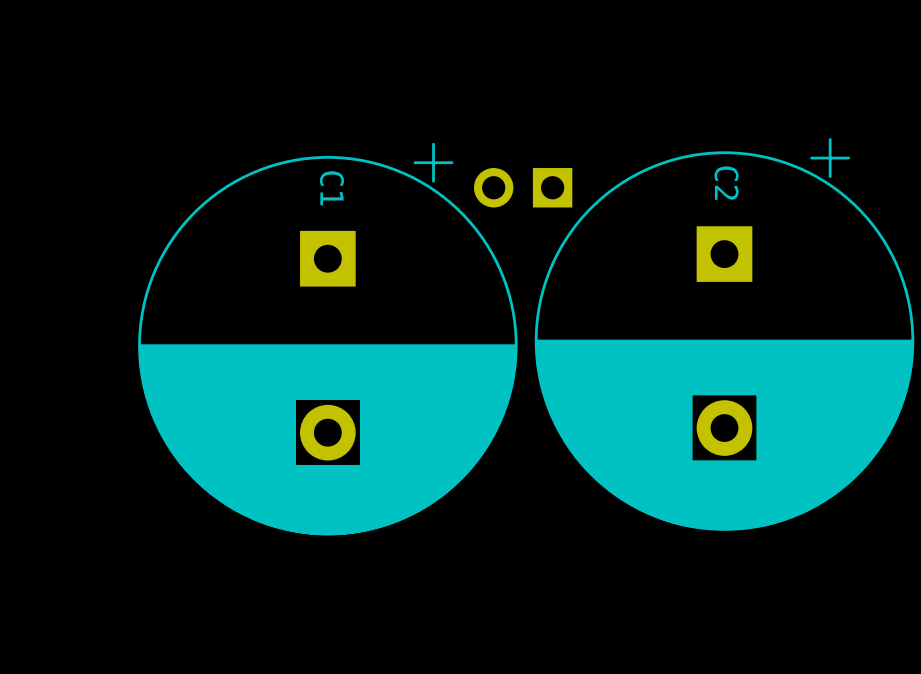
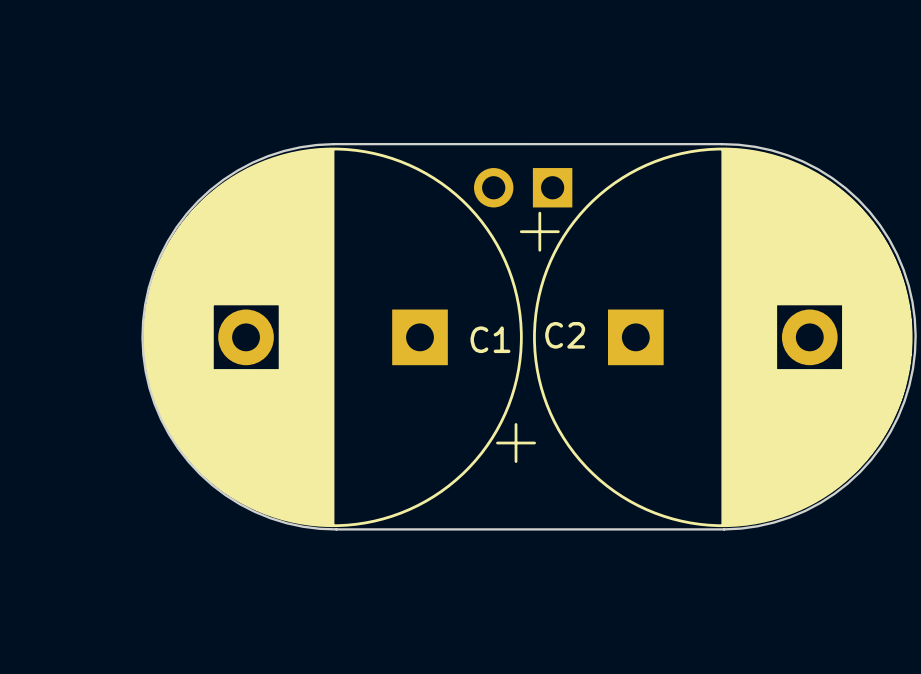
board edge: none -> (721, 144) (333, 144) (300, 147) (252, 162) (223, 179) (198, 201) (176, 227) (153, 272) (145, 304) (142, 338) (149, 387) (161, 419) (188, 461) (225, 495) (270, 518) (302, 526) (336, 529) (724, 529) (774, 522) (805, 510) (834, 493) (860, 472) (881, 446) (898, 417) (909, 385) (915, 352) (914, 318) (908, 285) (897, 254) (880, 225) (858, 199) (832, 178) (803, 161) (771, 150) (721, 144)
C2 rotation: 0° (724, 334) -> 90° counterclockwise (716, 337)
C1 rotation: 0° (327, 339) -> 90° clockwise (339, 337)

